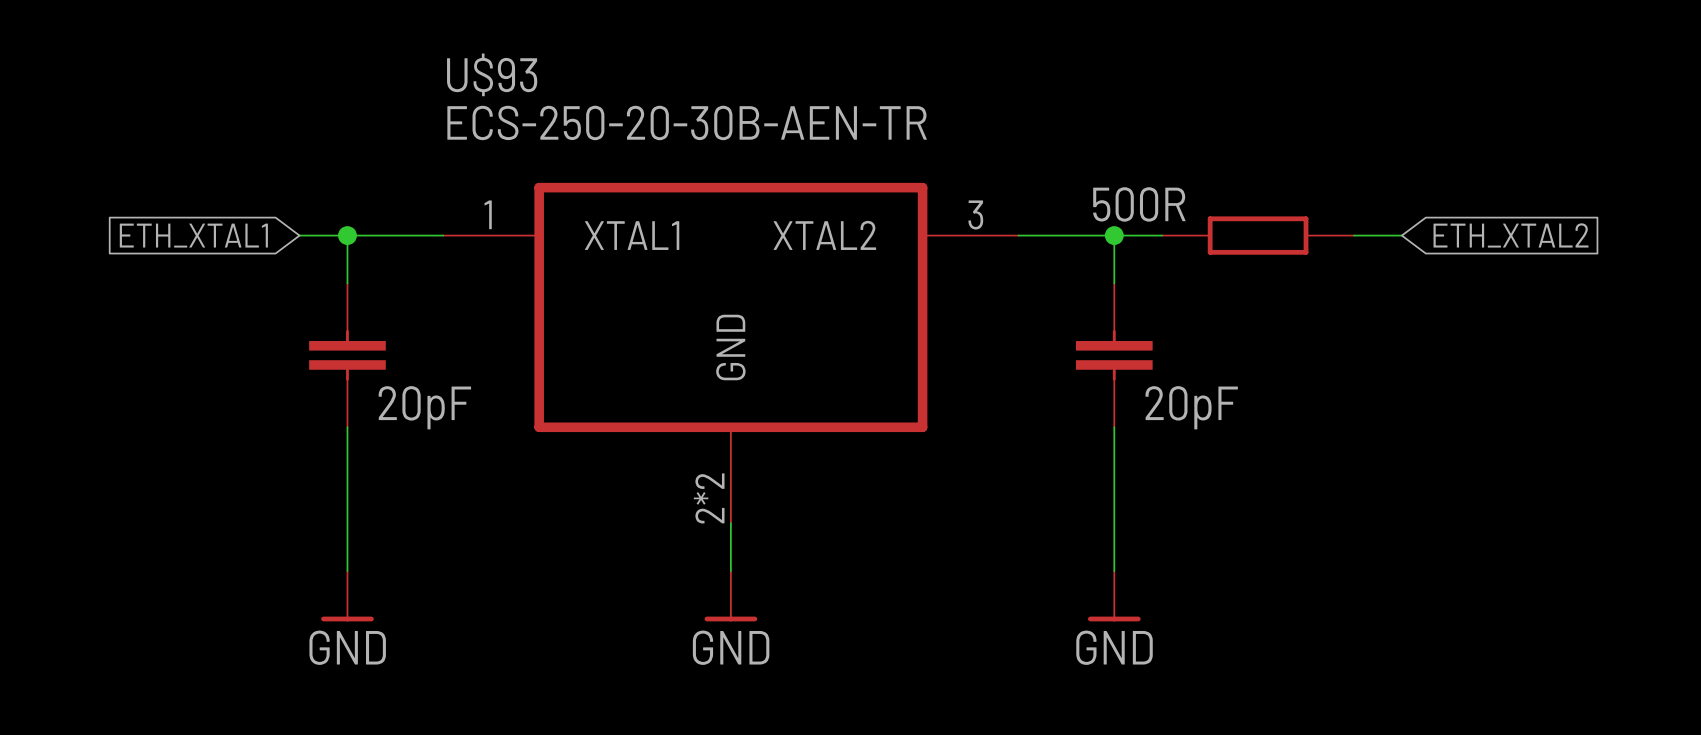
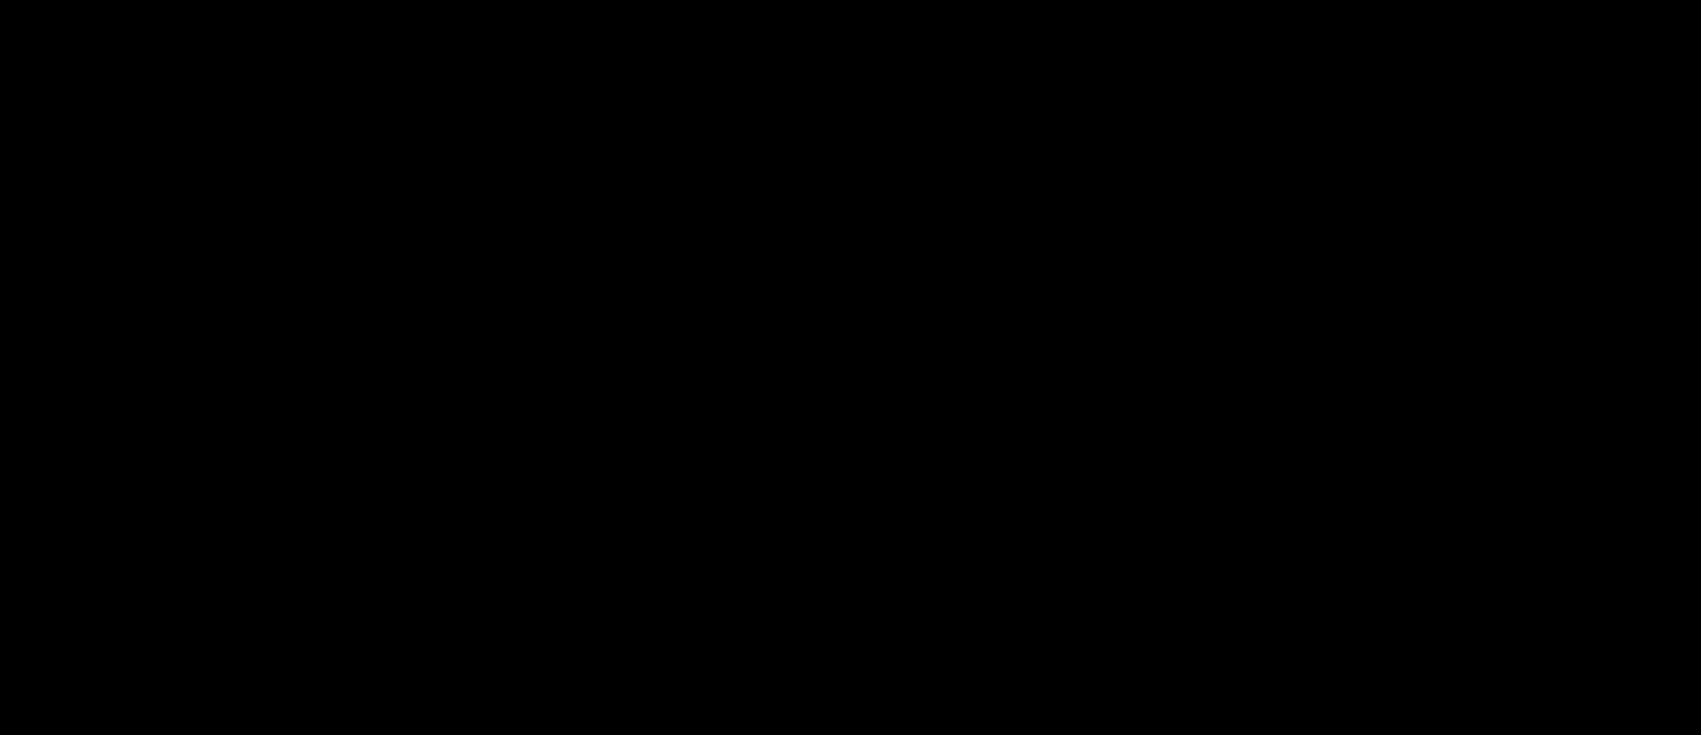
global label: ETH_XTAL1 (193, 235) -> none
wire: (299, 235) (443, 235) -> none
wire: (347, 235) (347, 283) -> none
junction: (347, 235) -> none
wire: (1018, 235) (1162, 235) -> none
wire: (1114, 235) (1114, 283) -> none
junction: (1114, 235) -> none
part: 500R (1258, 235) -> none
wire: (1353, 235) (1401, 235) -> none
global label: ETH_XTAL2 (1510, 235) -> none
U$93: ECS-250-20-30B-AEN-TR (730, 352) -> none
part: 20pF (347, 355) -> none
part: 20pF (1114, 355) -> none
wire: (347, 427) (347, 571) -> none
wire: (1114, 427) (1114, 571) -> none
wire: (730, 523) (730, 571) -> none
power symbol: GND (347, 596) -> none
power symbol: GND (730, 596) -> none
power symbol: GND (1114, 596) -> none

